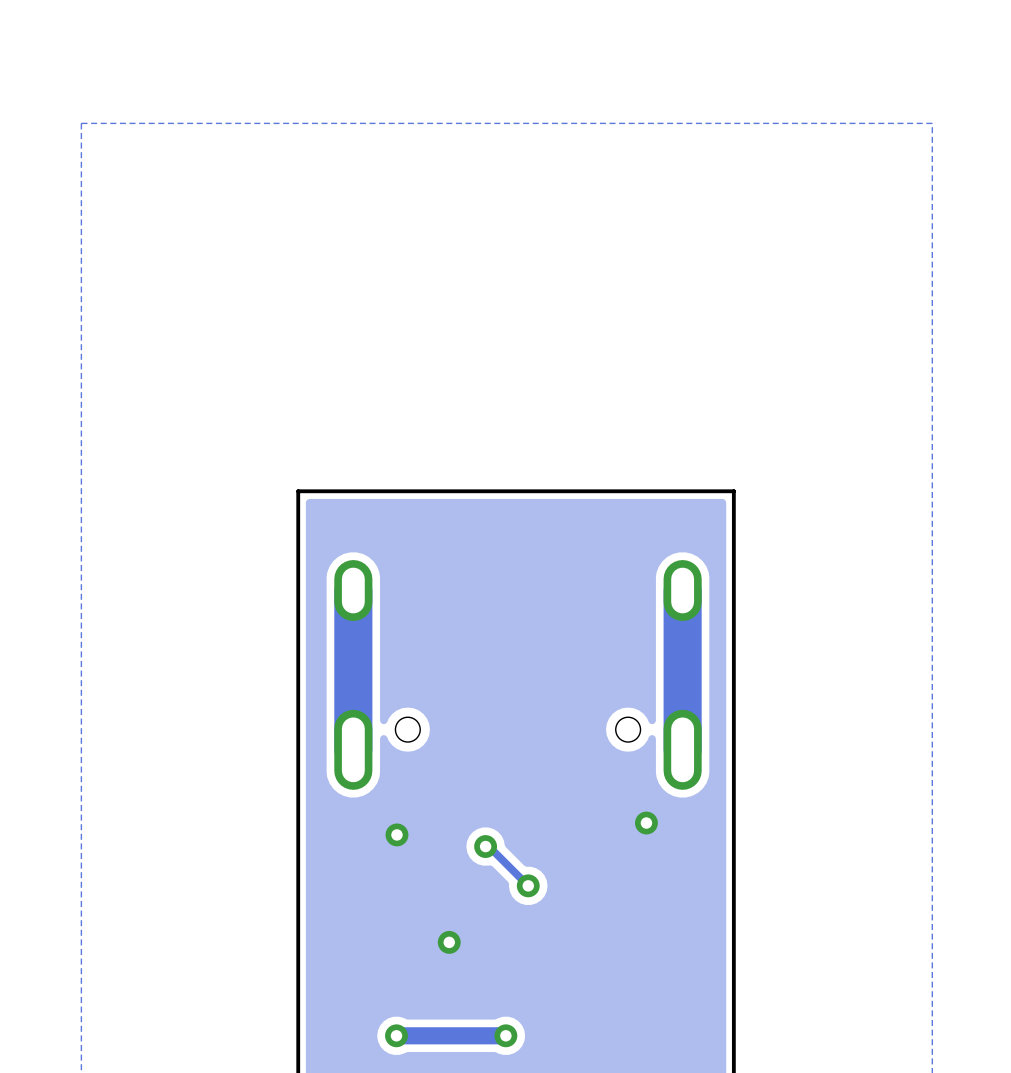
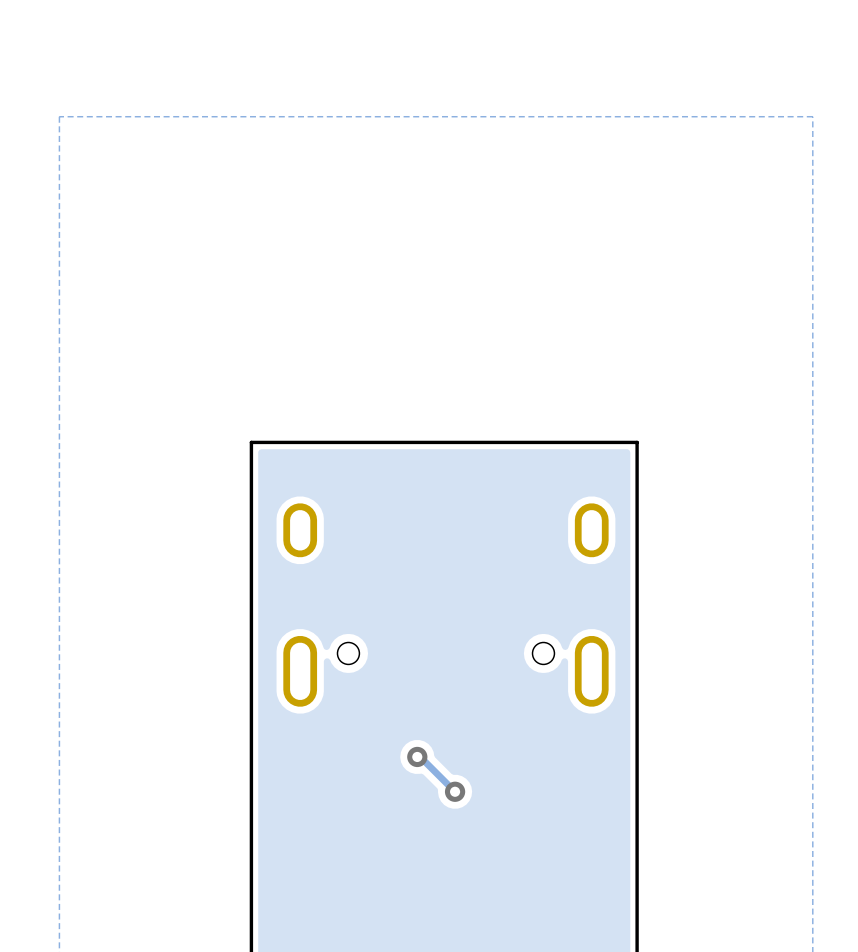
track: (353, 590) (353, 749) -> none
track: (682, 590) (682, 749) -> none
via: (646, 823) -> none
via: (396, 834) -> none
via: (449, 942) -> none
via: (396, 1035) -> none
track: (505, 1035) (396, 1035) -> none
via: (505, 1035) -> none

